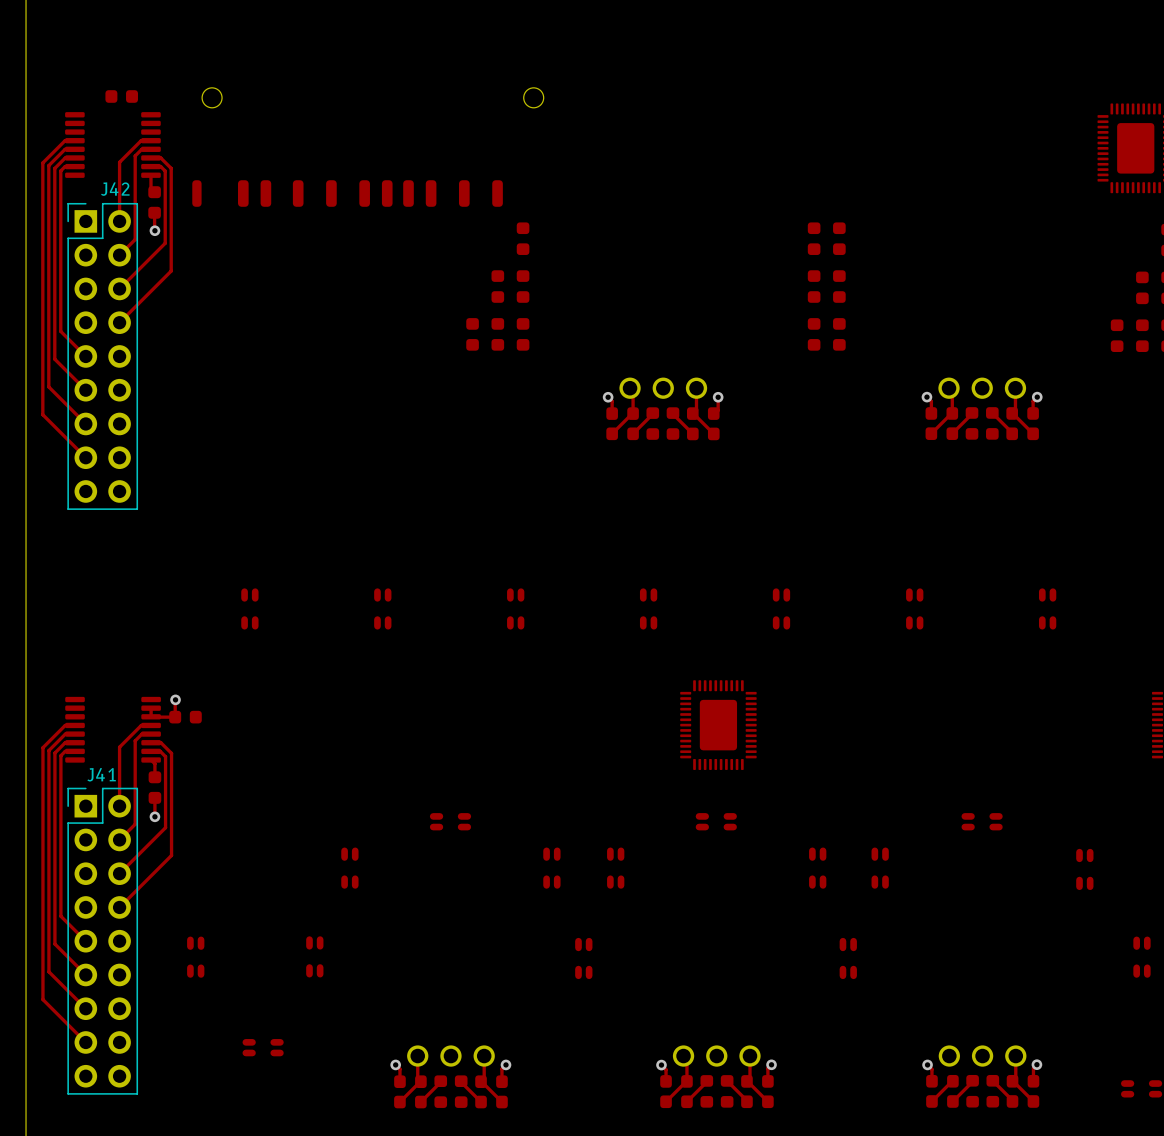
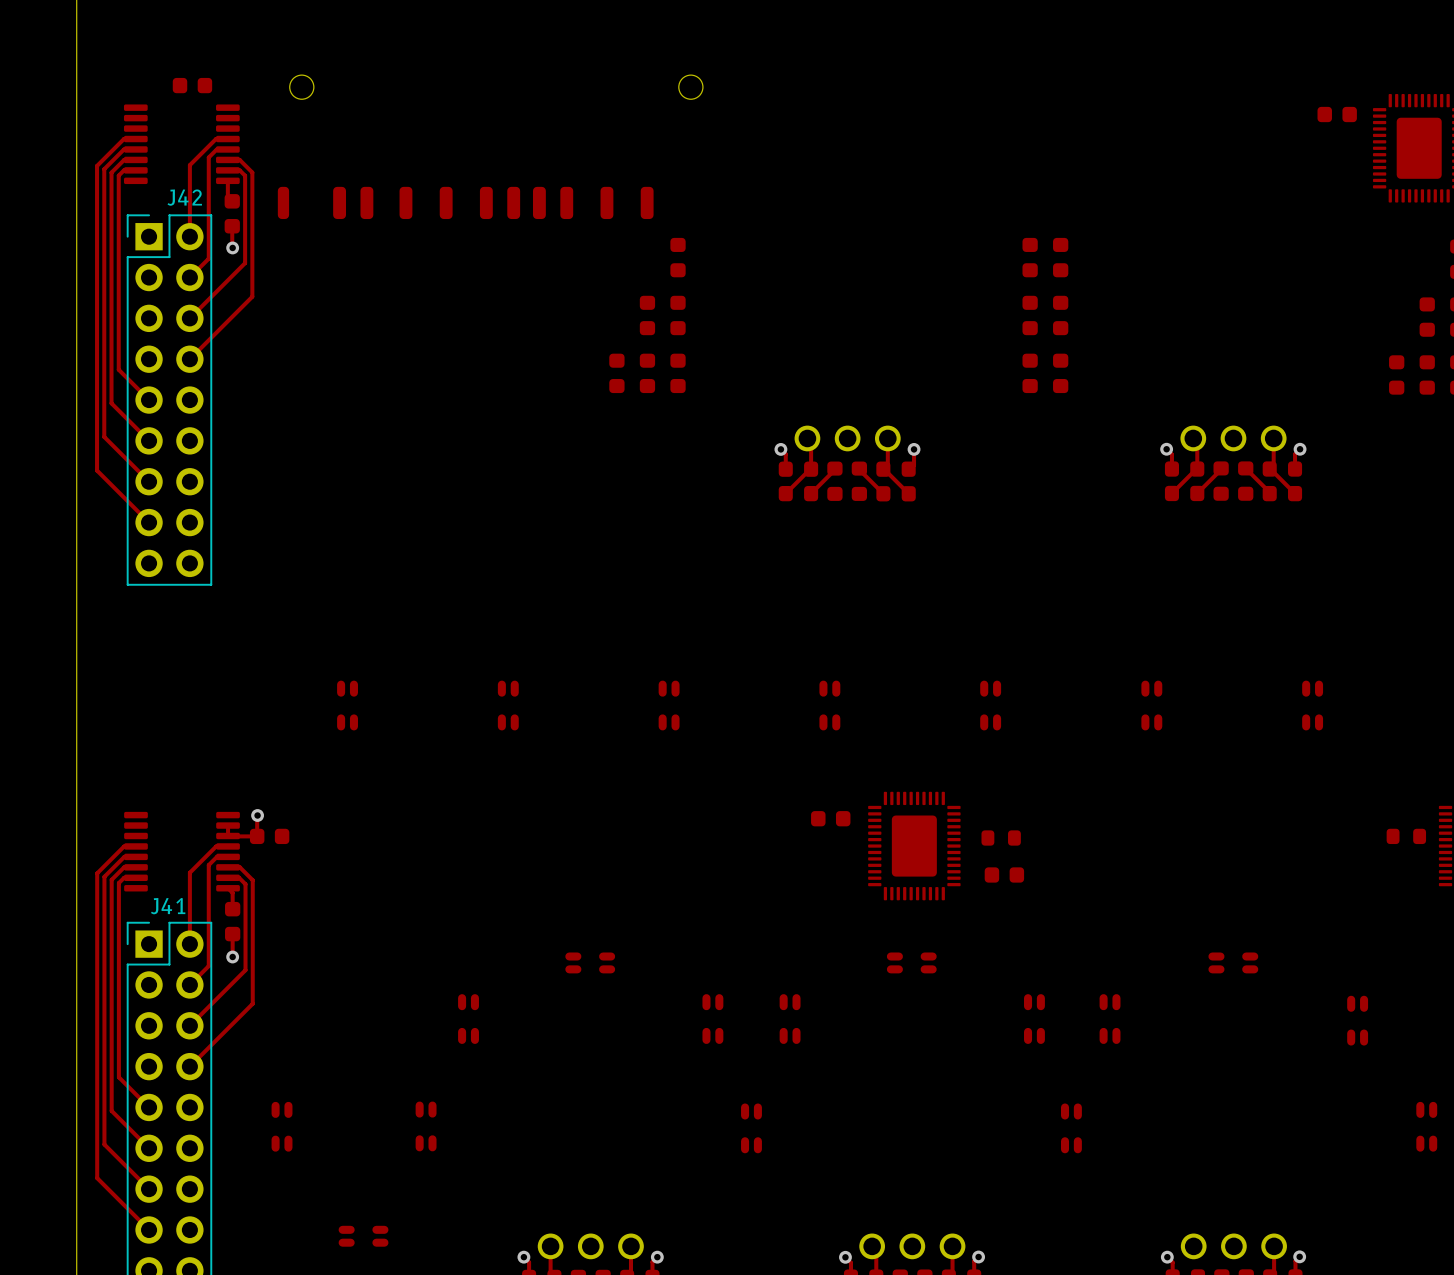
part: none -> (1337, 114)
part: none -> (830, 818)
part: none -> (1406, 836)
part: none -> (1001, 838)
part: none -> (1004, 874)

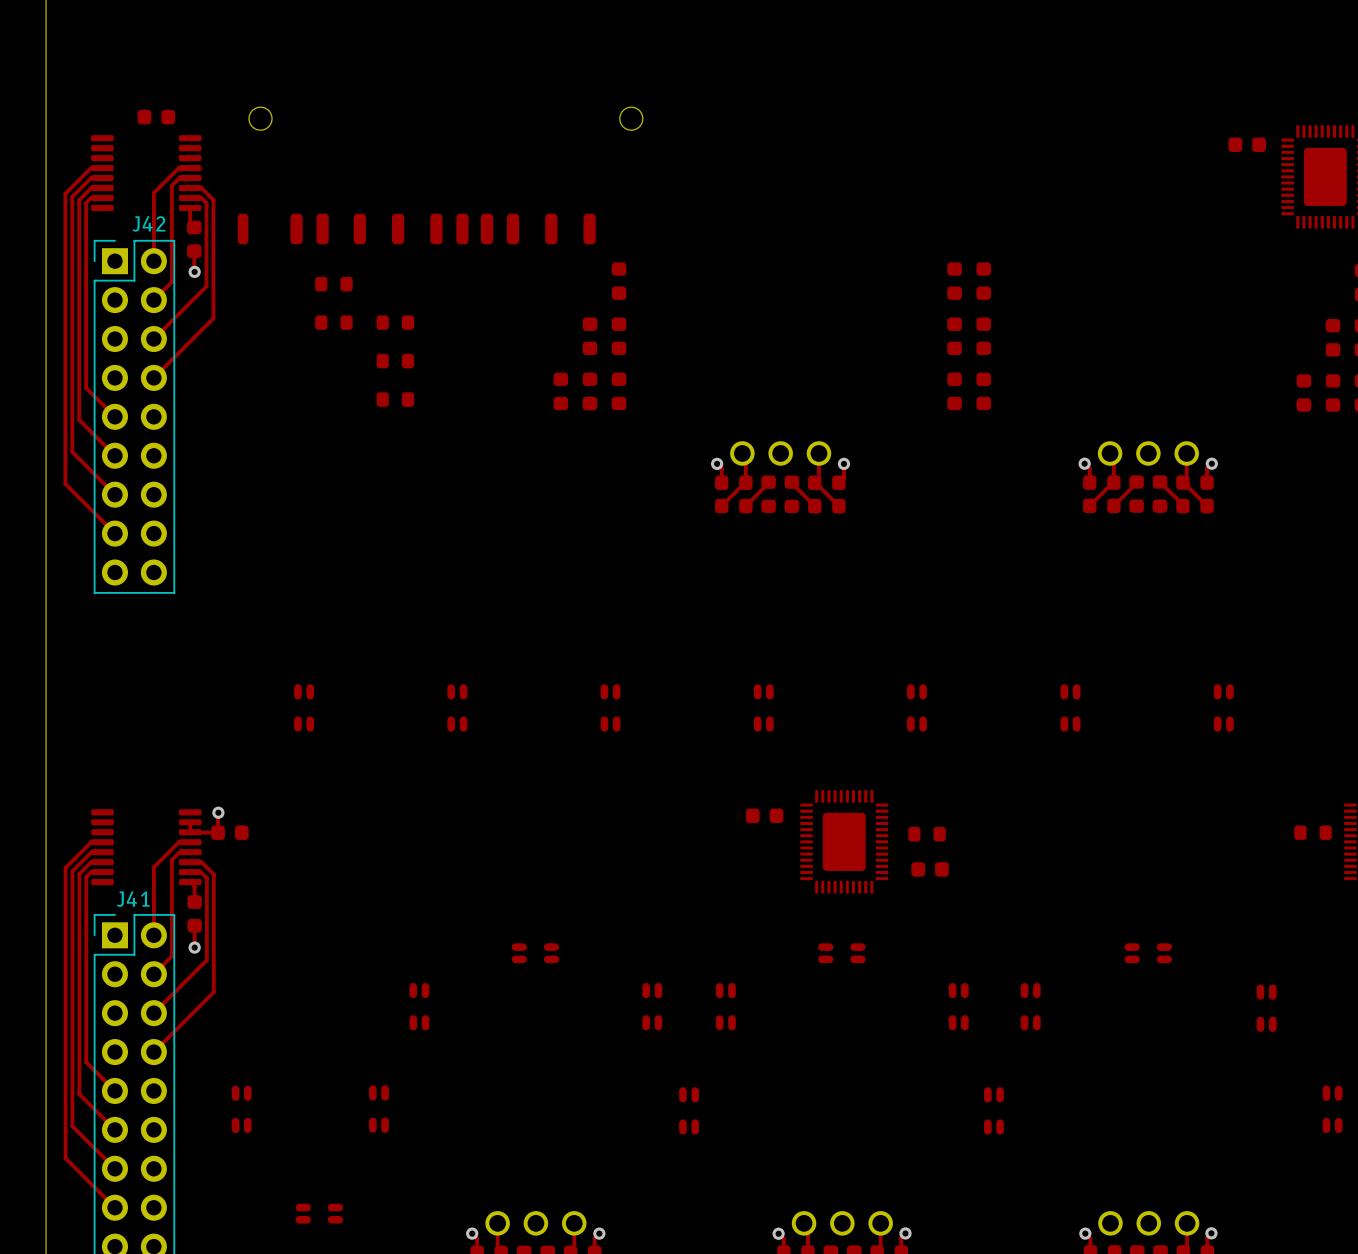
part: none -> (333, 284)
part: none -> (333, 322)
part: none -> (395, 322)
part: none -> (395, 361)
part: none -> (395, 399)

